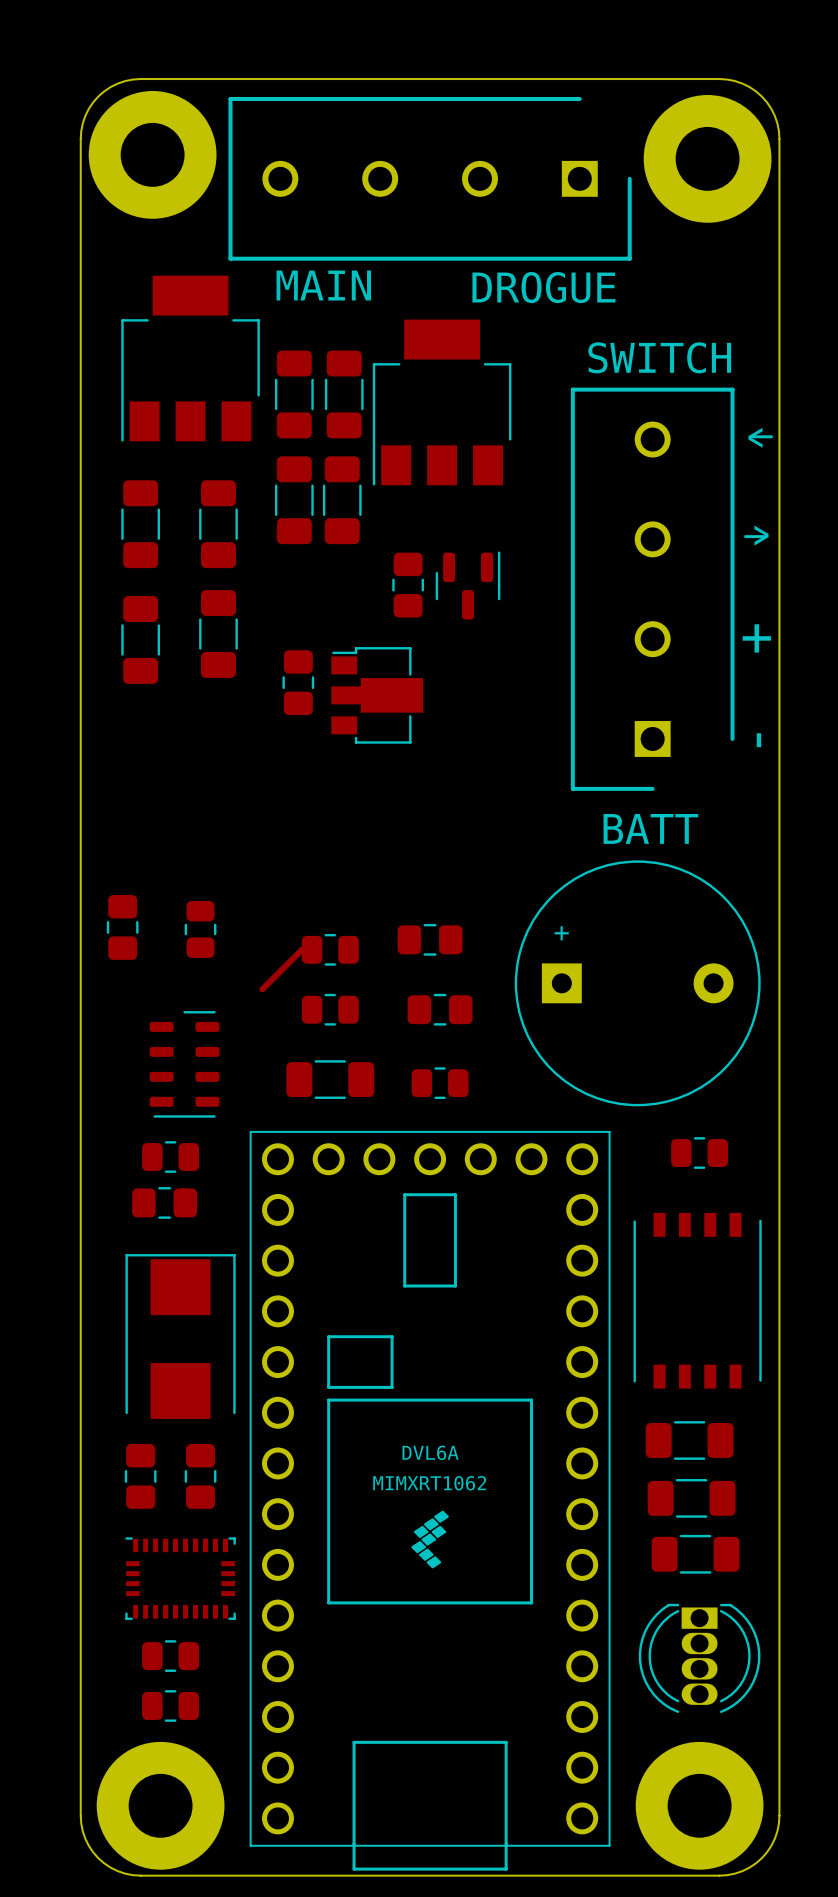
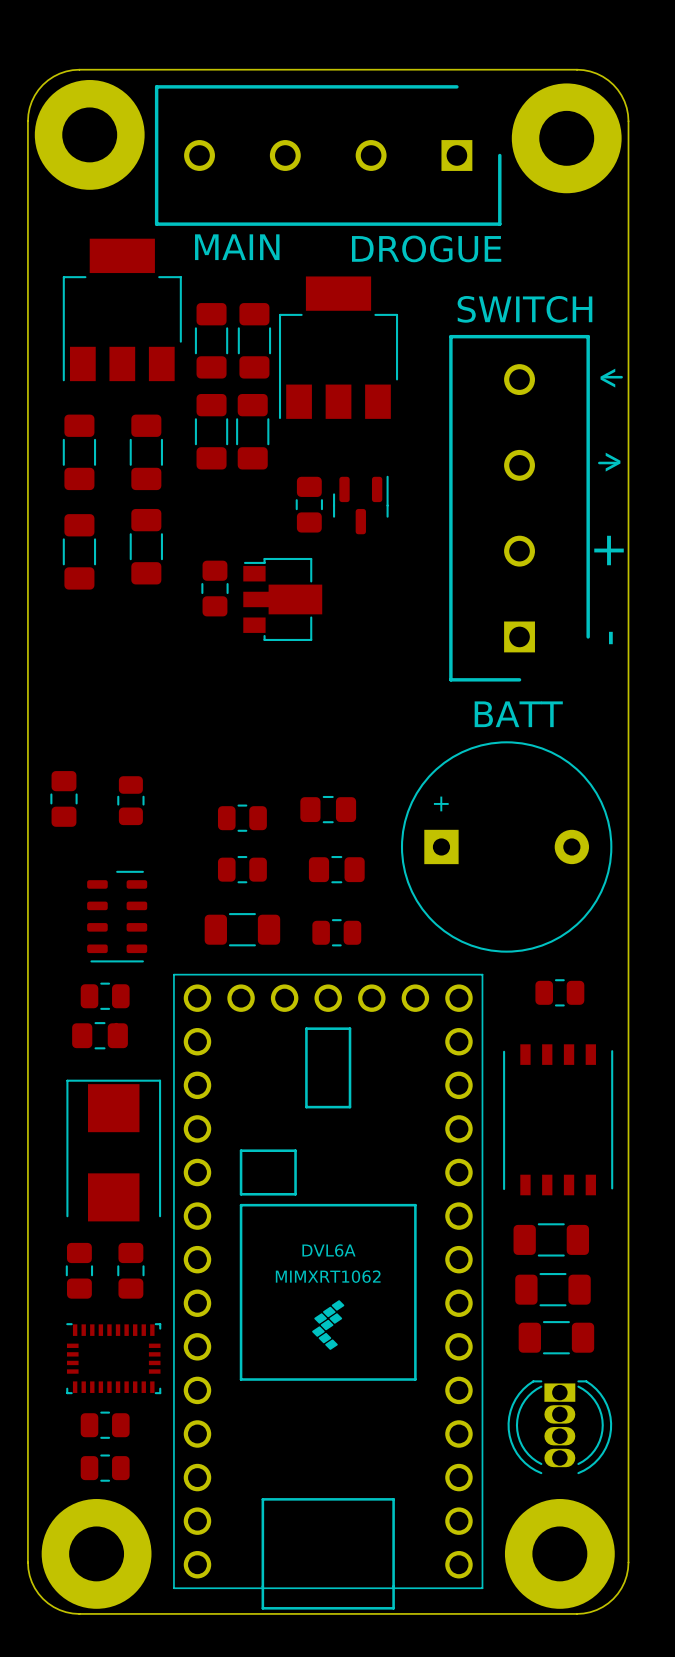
top track: (312, 949) (301, 949) (262, 989) -> none

